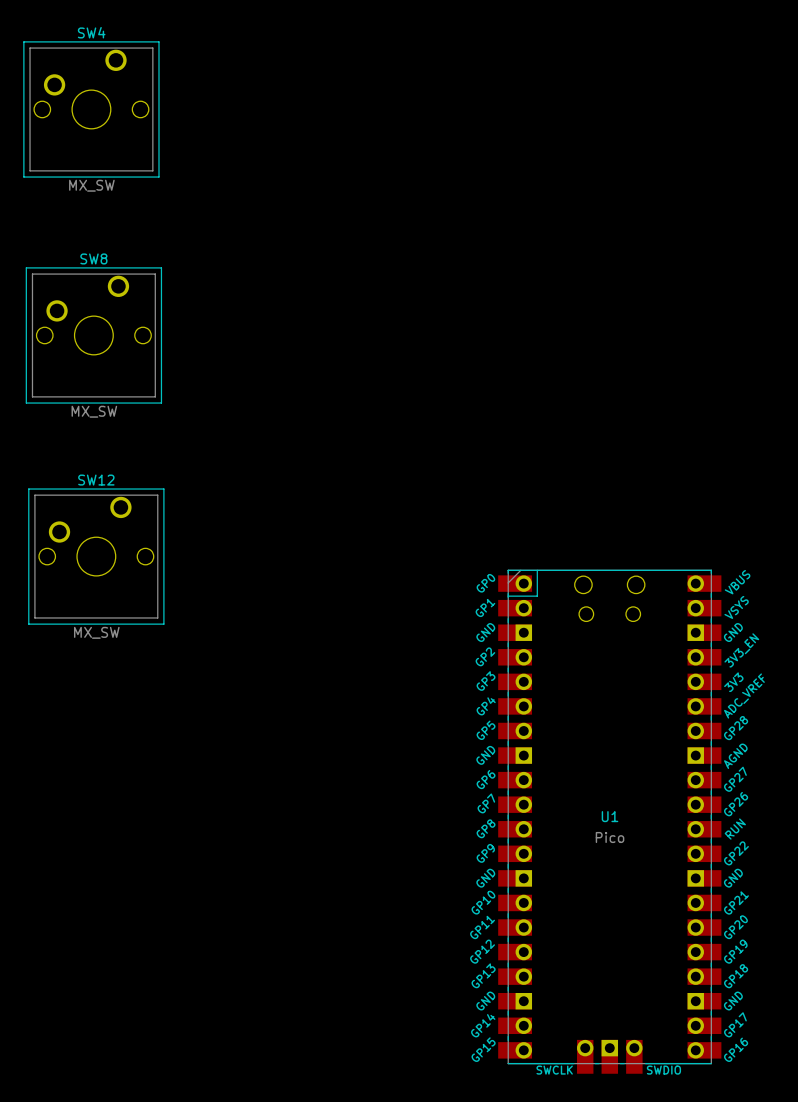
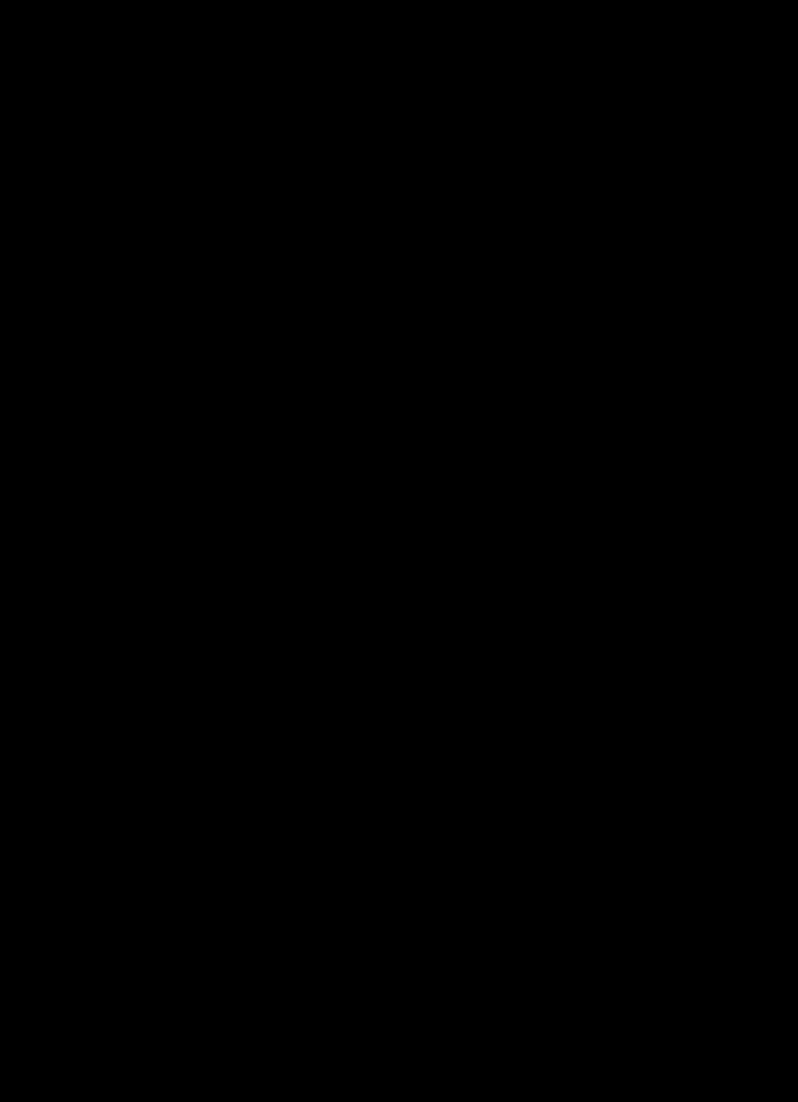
SW4: MX_SW (91, 109) -> none
SW8: MX_SW (93, 335) -> none
SW12: MX_SW (96, 556) -> none
U1: Pico (609, 821) -> none

